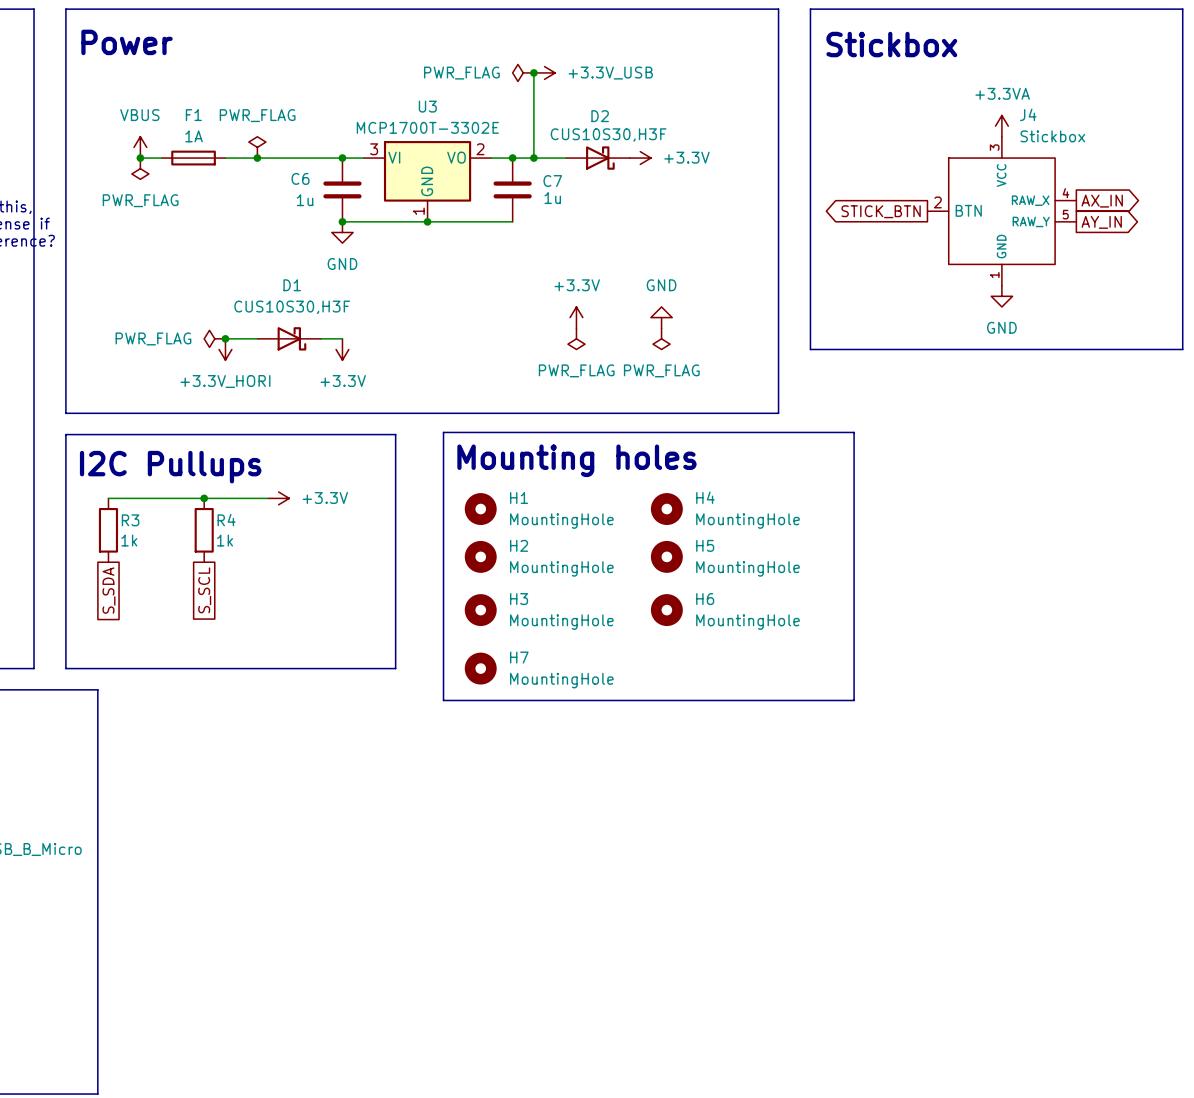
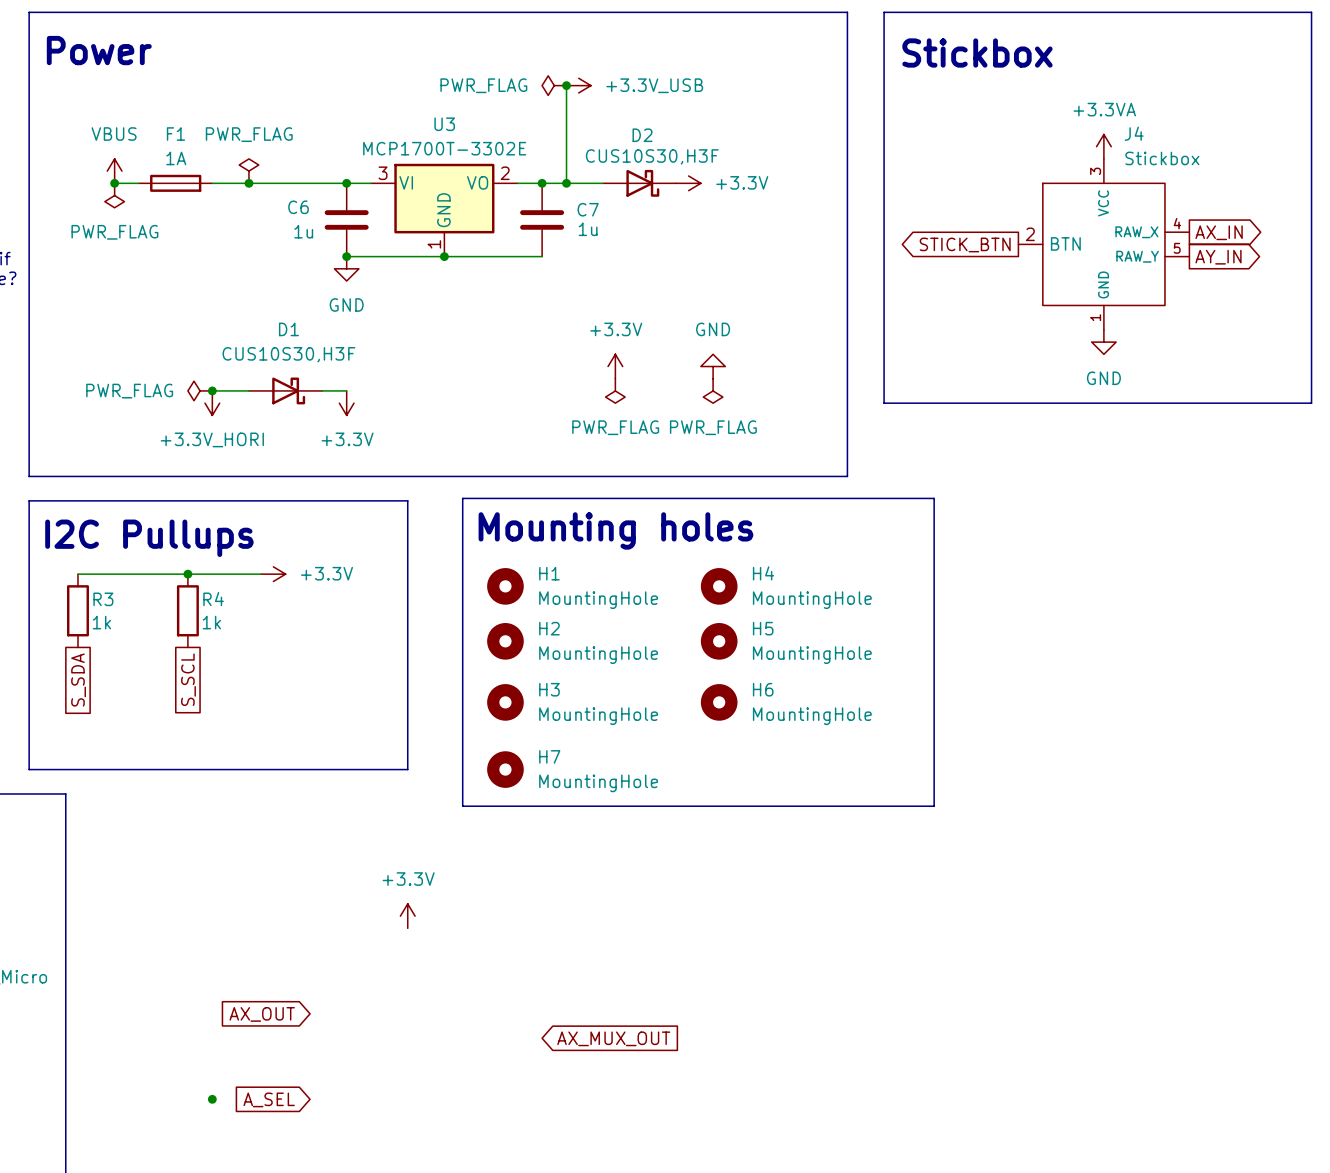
power symbol: none -> +3.3V (407, 916)
global label: none -> AX_OUT (262, 1014)
global label: none -> AX_MUX_OUT (613, 1038)
junction: none -> (212, 1099)
global label: none -> A_SEL (269, 1099)

